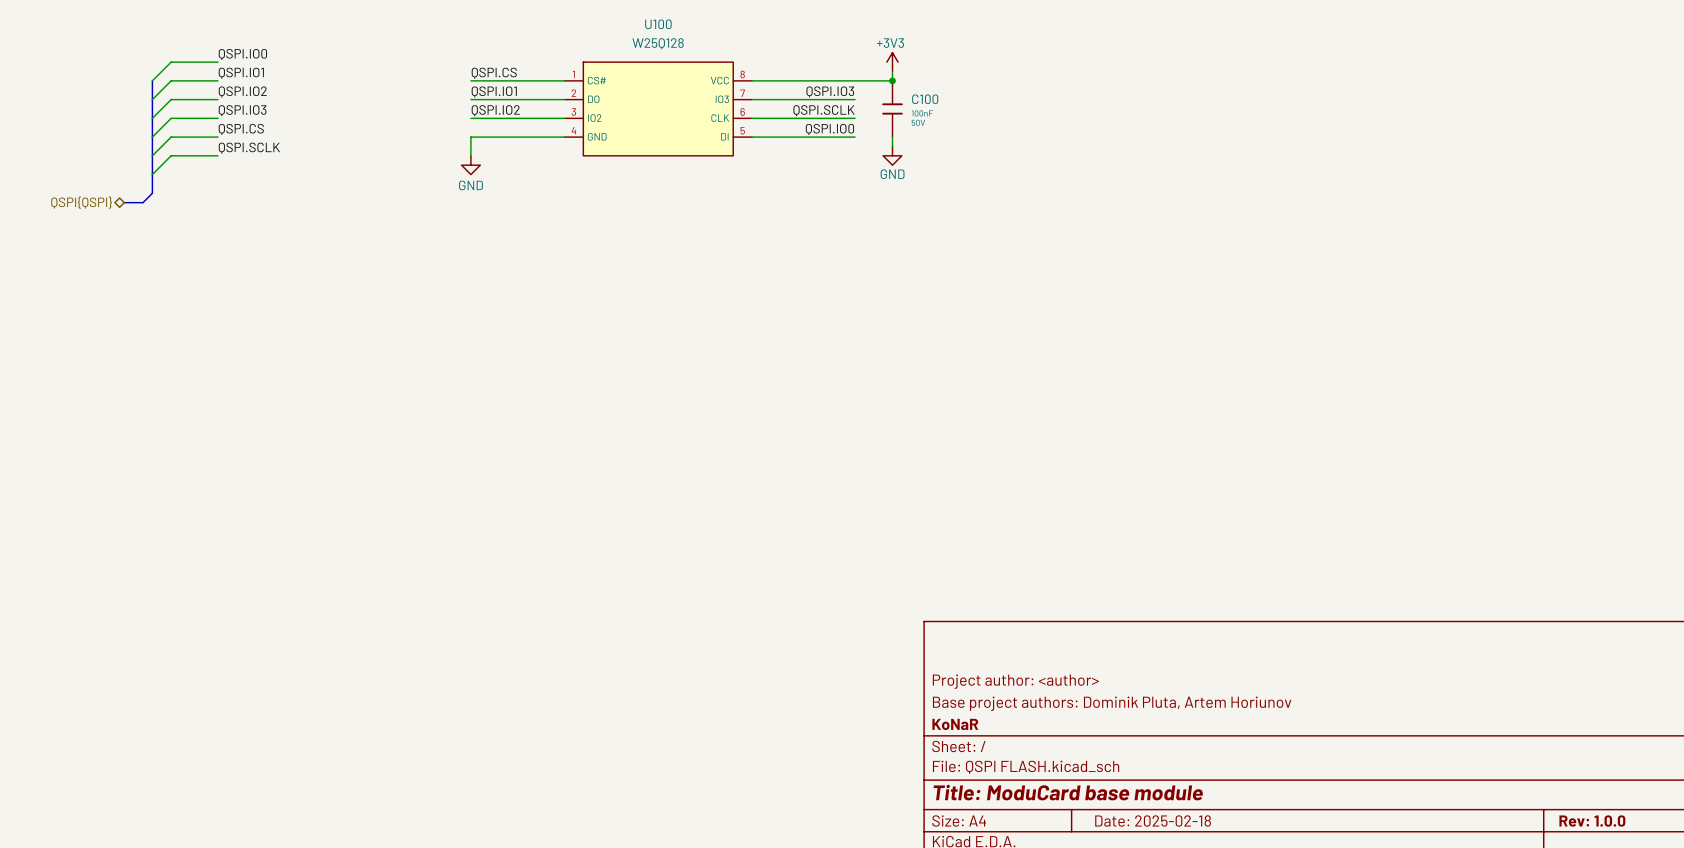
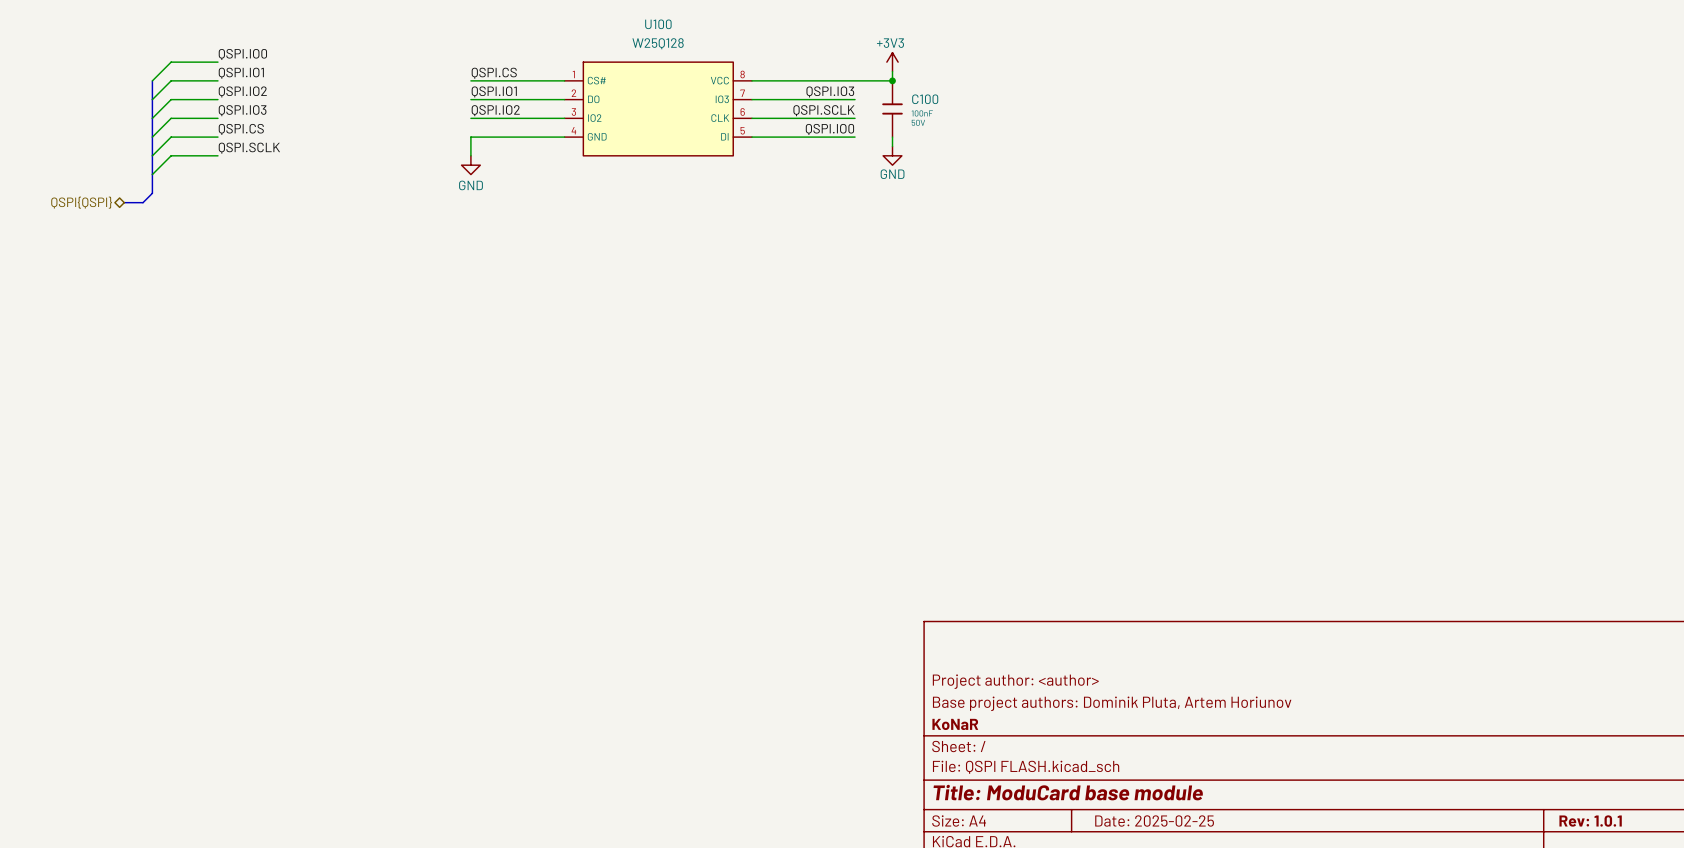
title block: Date: 2025-02-18 (1153, 821) -> Date: 2025-02-25 (1154, 821)
title block: Rev: 1.0.0 (1592, 821) -> Rev: 1.0.1 (1590, 821)

